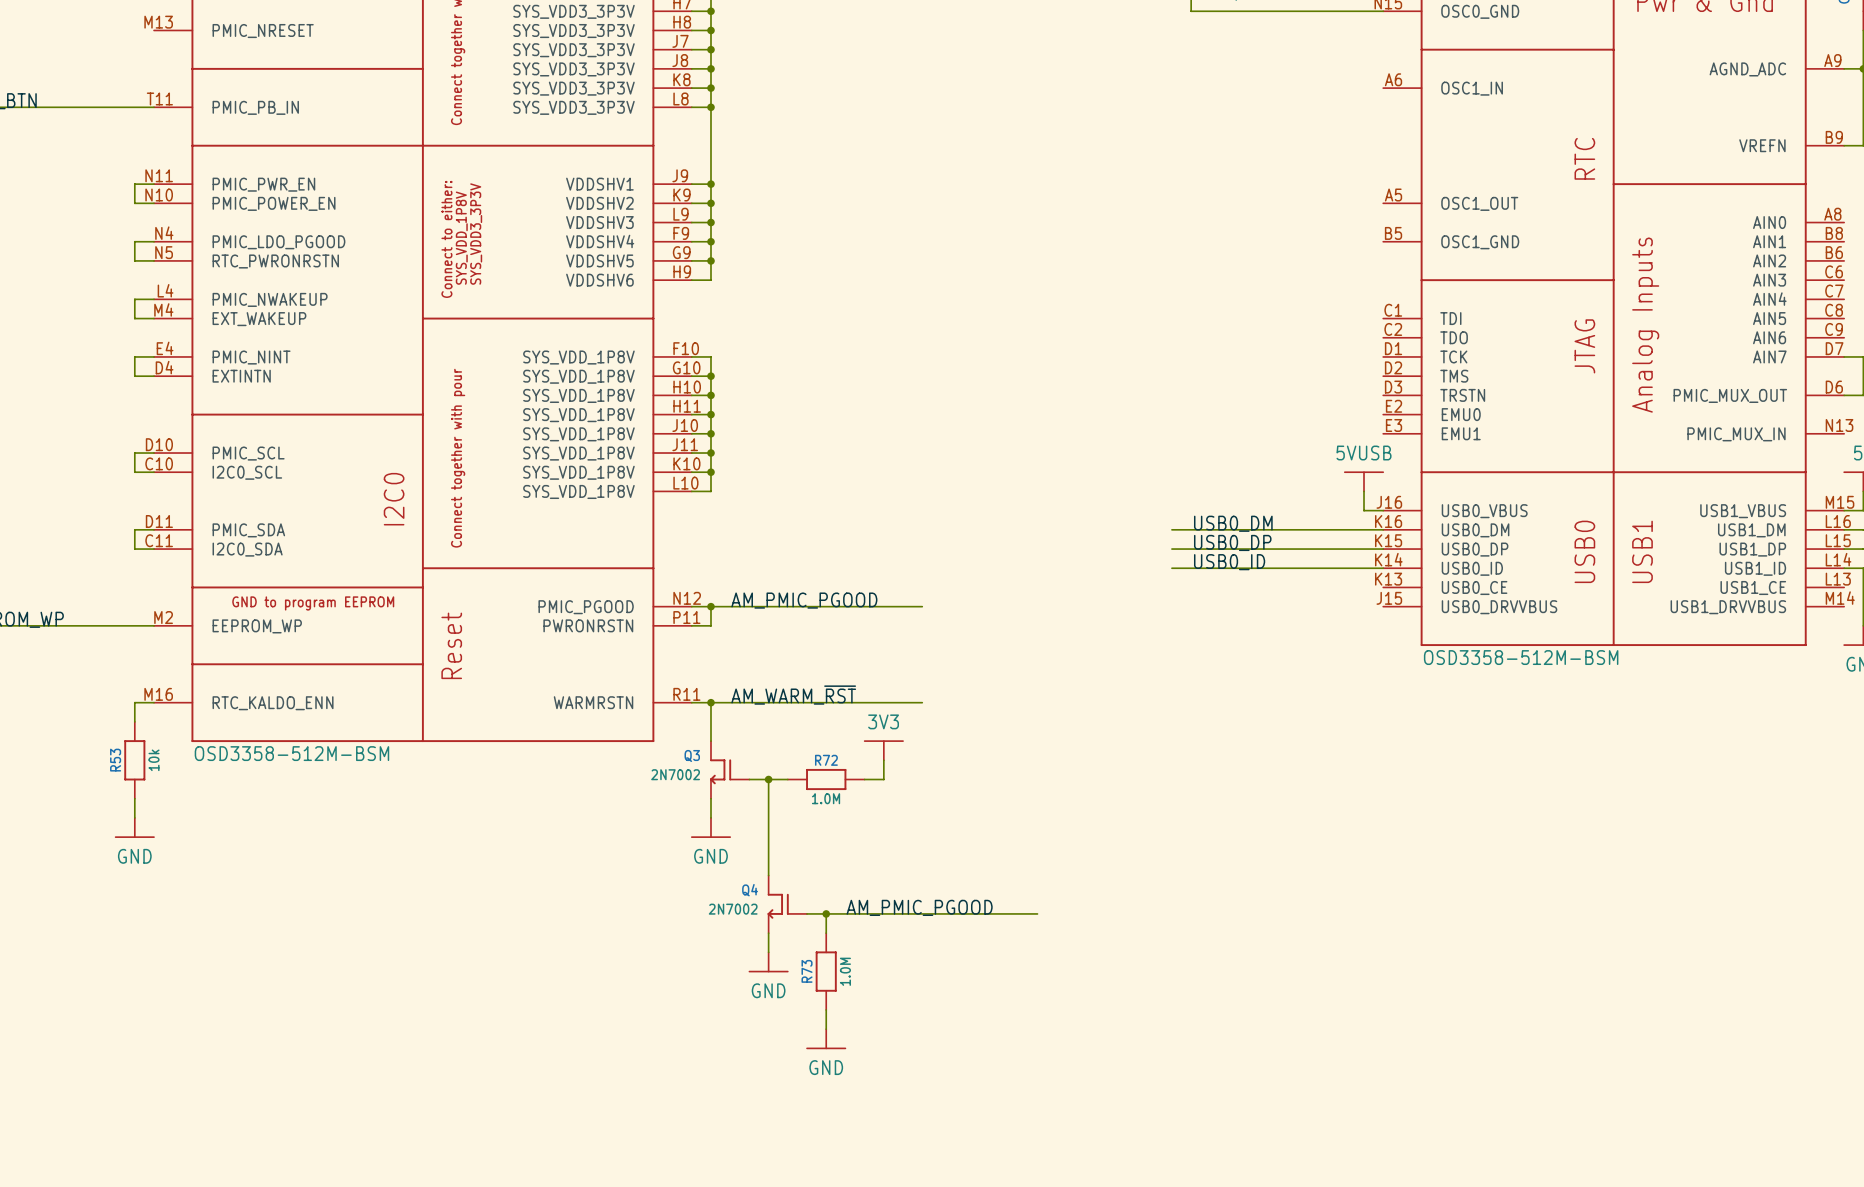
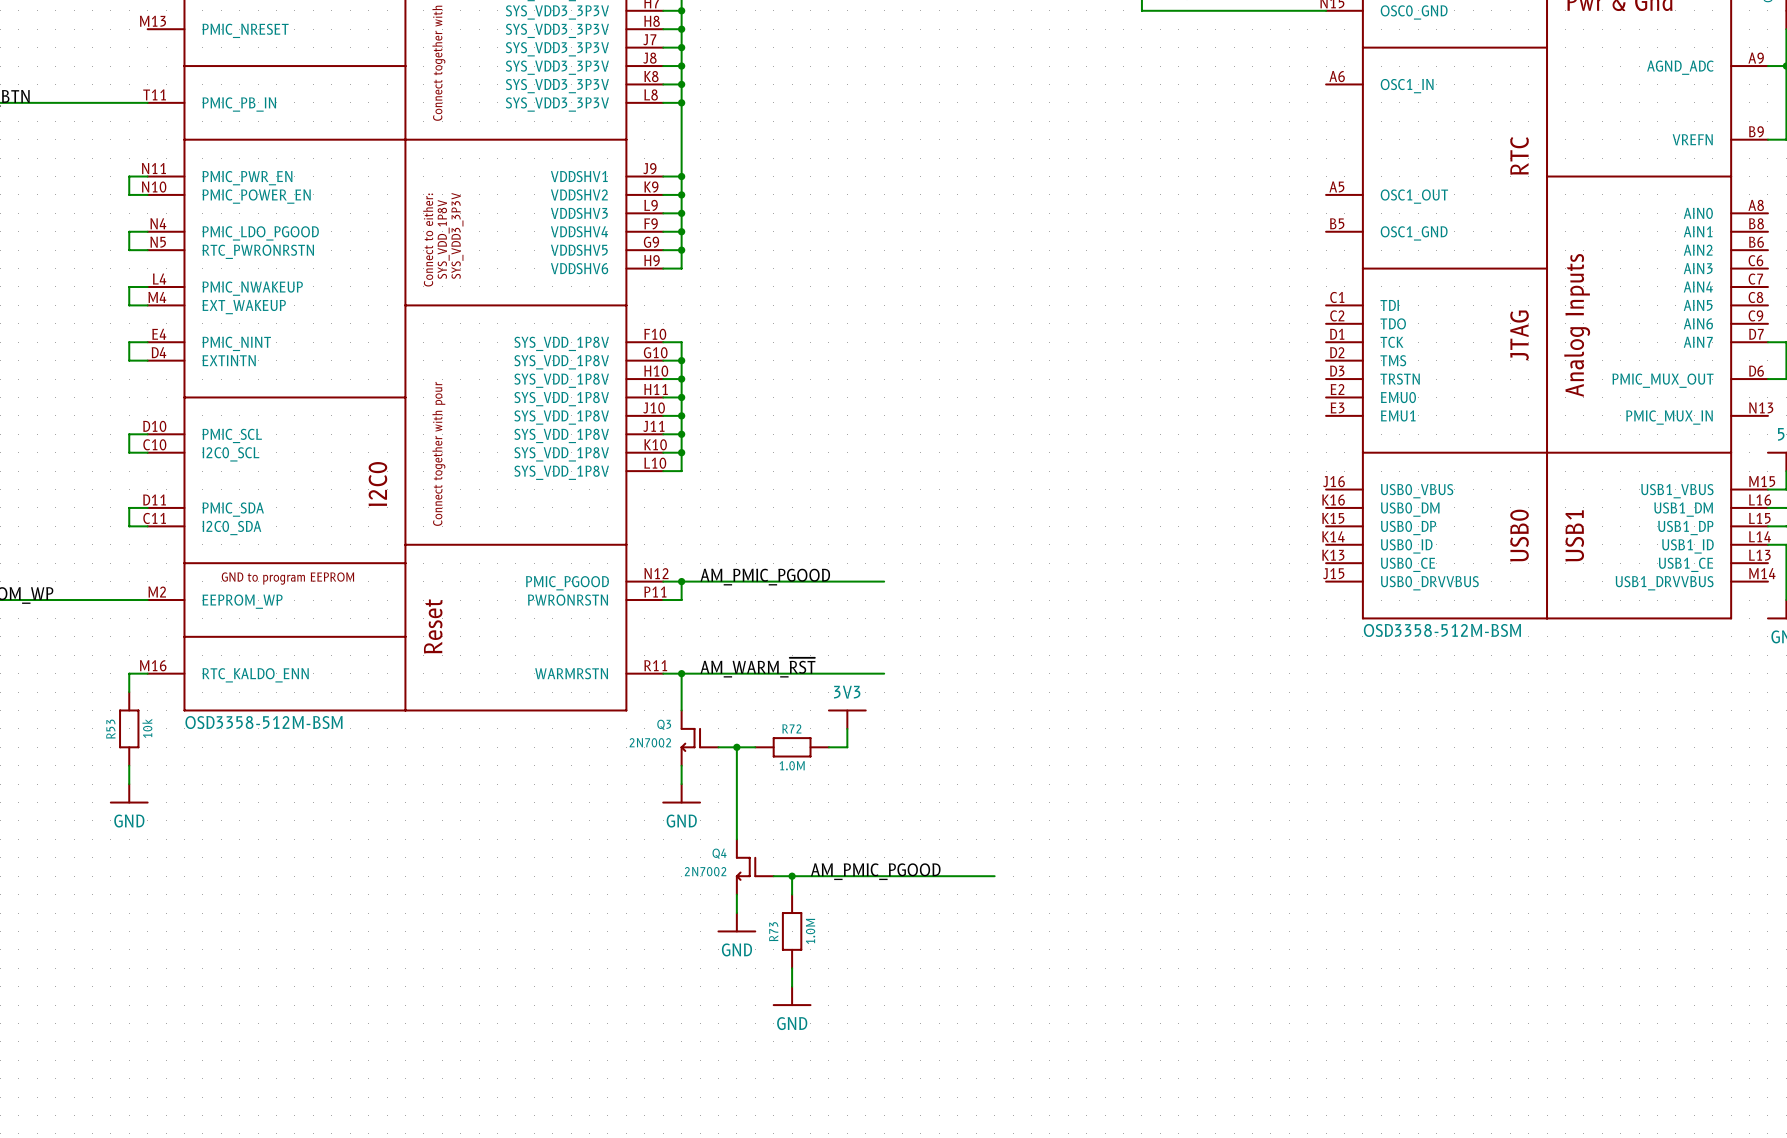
power symbol: 5VUSB (1364, 481) -> none
wire: (1364, 491) (1364, 510) (1383, 510) -> none
label: USB0_DM (1233, 523) -> none
wire: (1171, 529) (1383, 529) -> none
label: USB0_DP (1232, 542) -> none
wire: (1171, 549) (1383, 549) -> none
label: USB0_ID (1229, 562) -> none
wire: (1171, 568) (1383, 568) -> none

